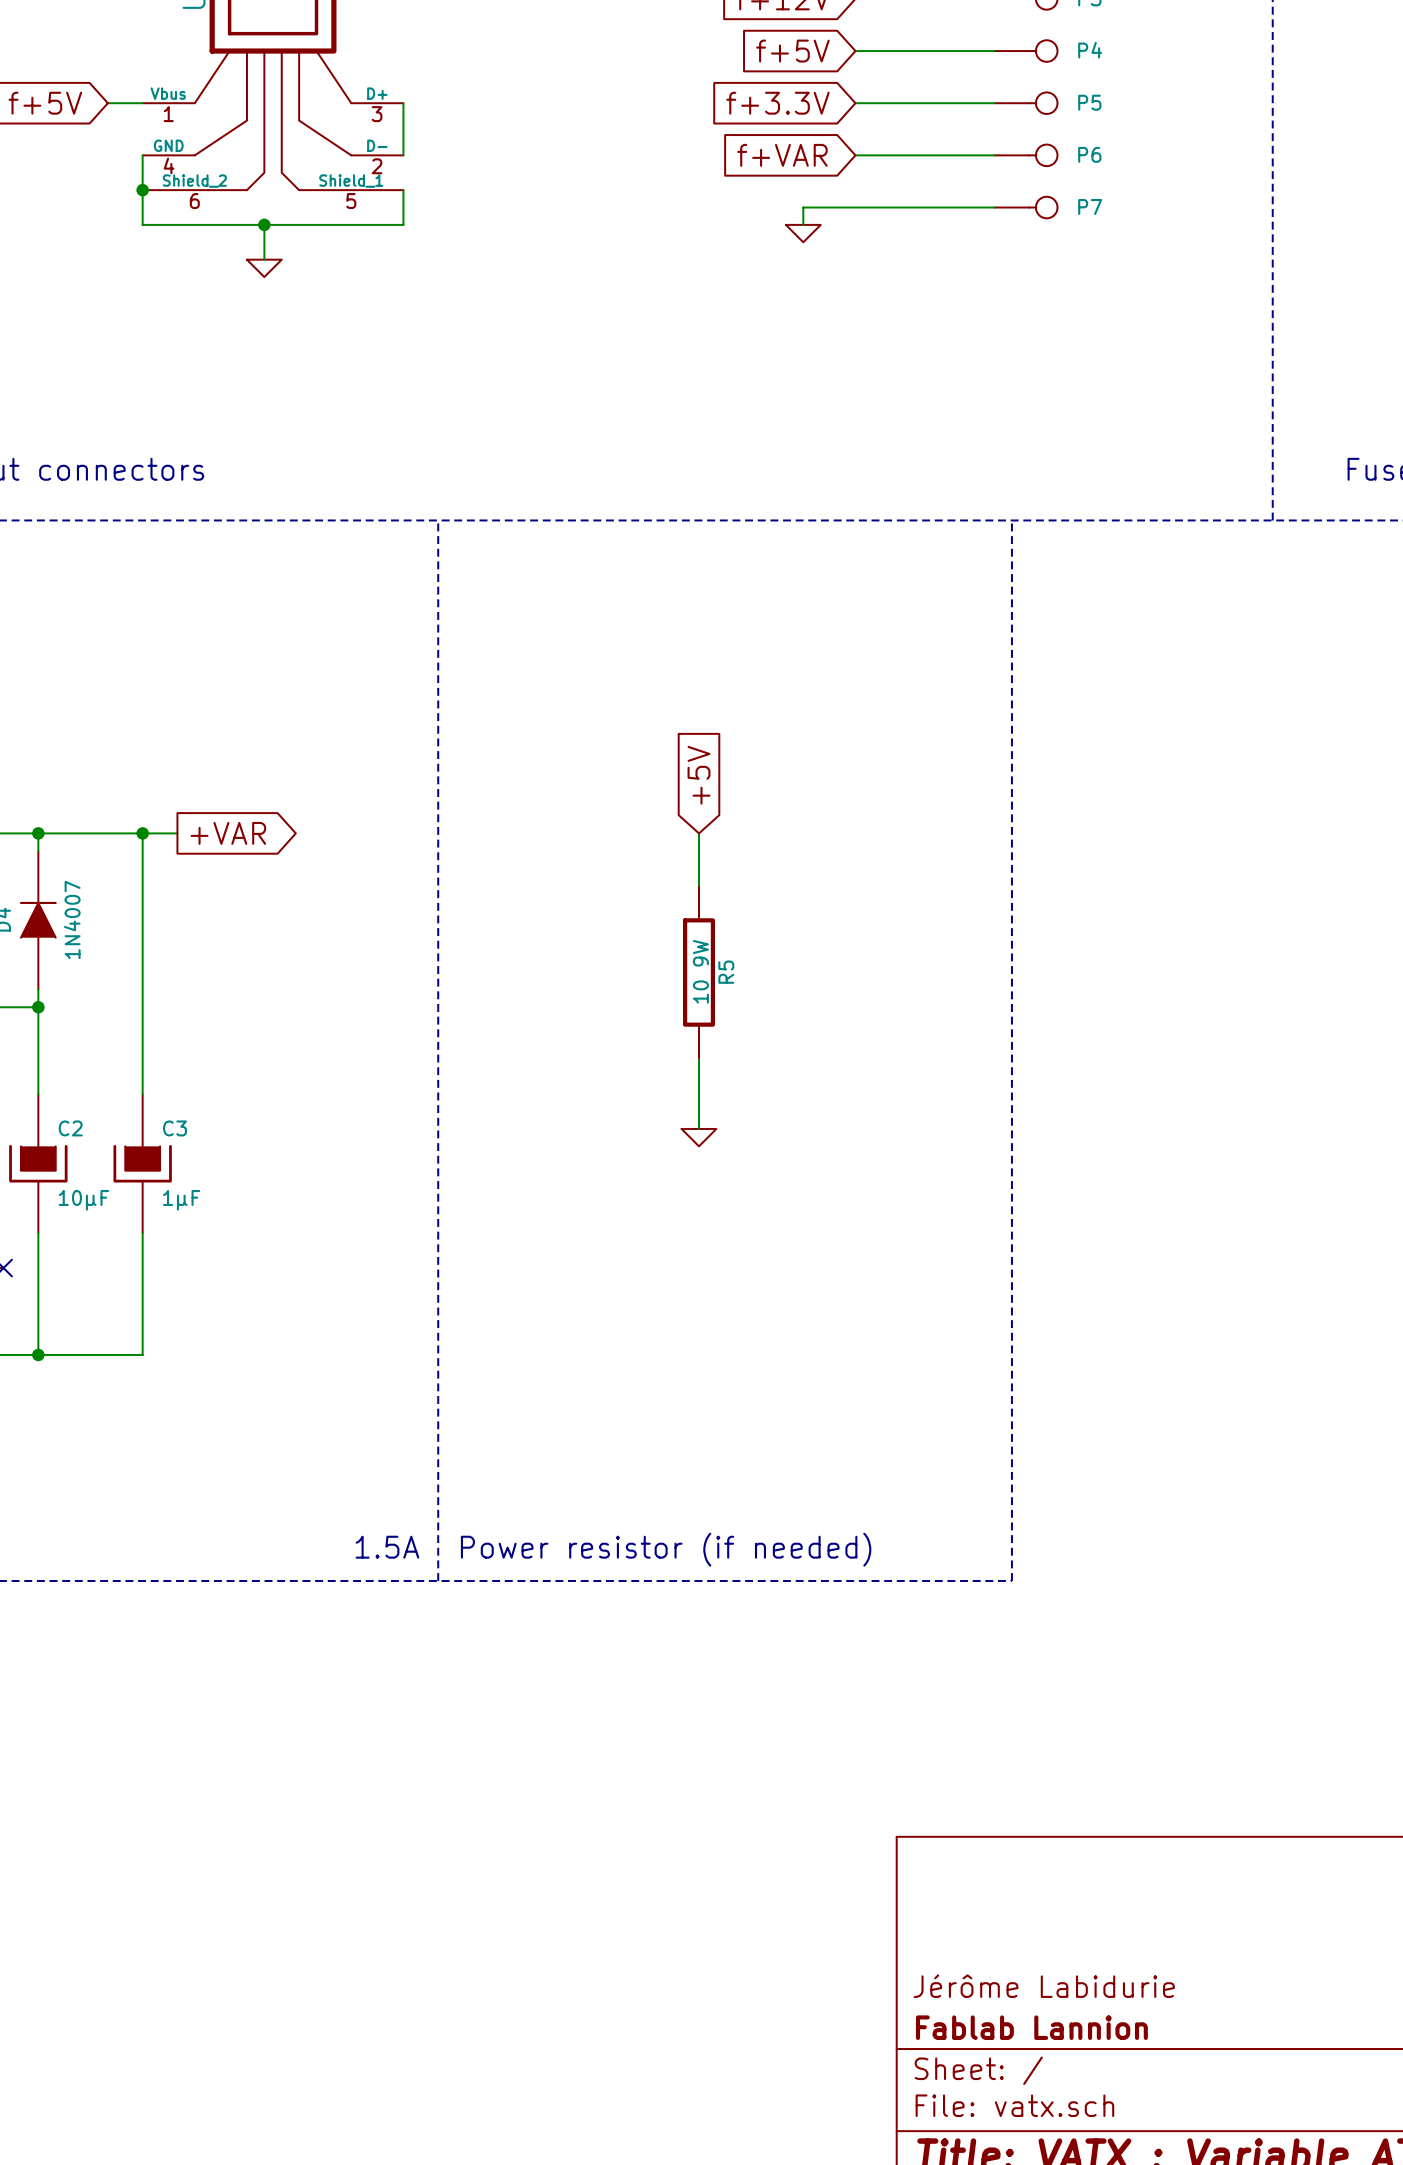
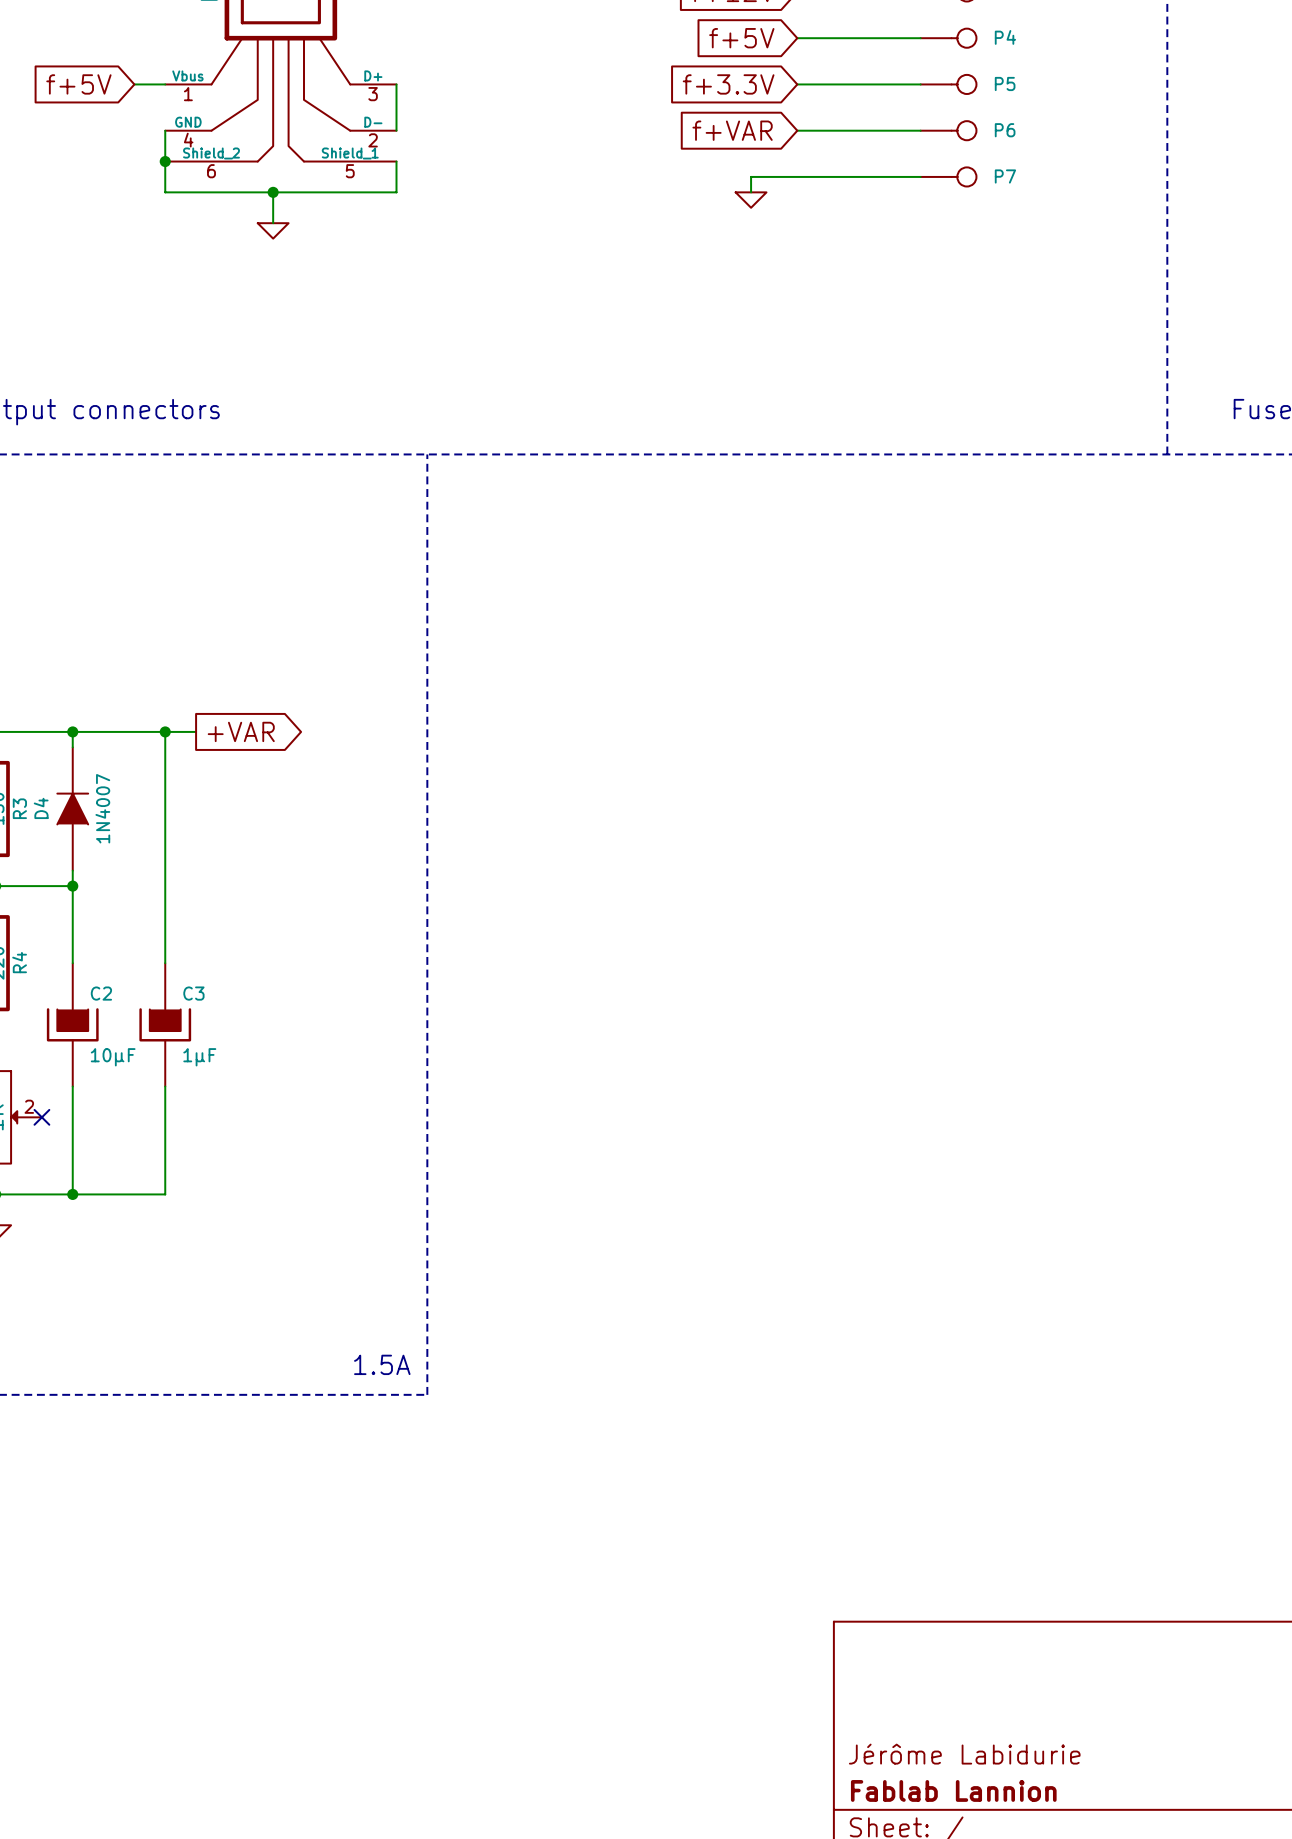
line: (1011, 520) (1011, 1580) (438, 1580) -> none
global label: +5V (699, 775) -> none
wire: (699, 833) (699, 885) -> none
R5: 10 9W (699, 972) -> none
wire: (699, 1059) (699, 1128) -> none
power symbol: (699, 1137) -> none
text: Power resistor (if needed) (666, 1549) -> none

